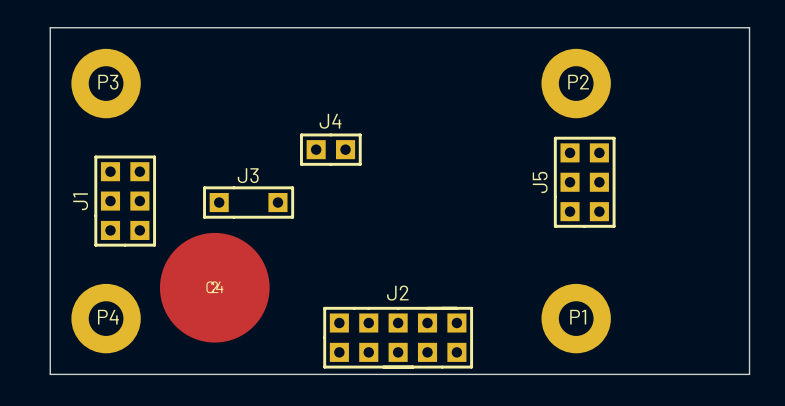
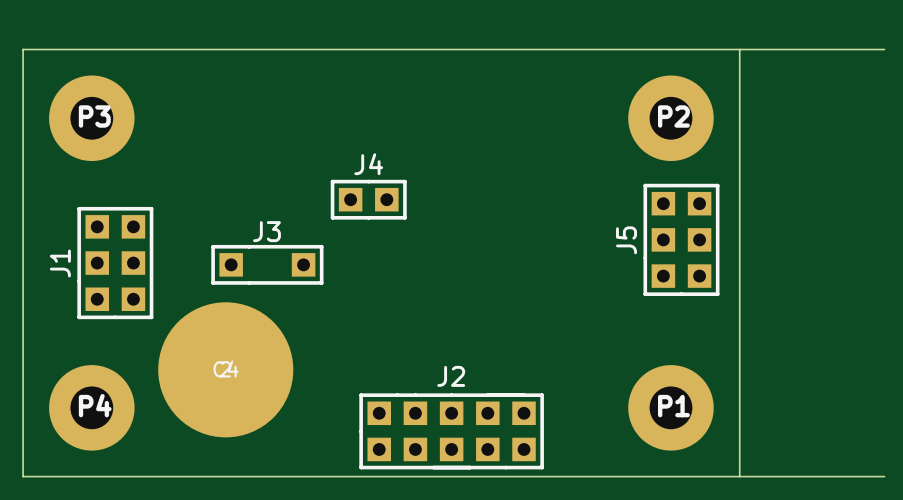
board edge: (749, 27) (749, 374) -> (739, 49) (739, 476)

